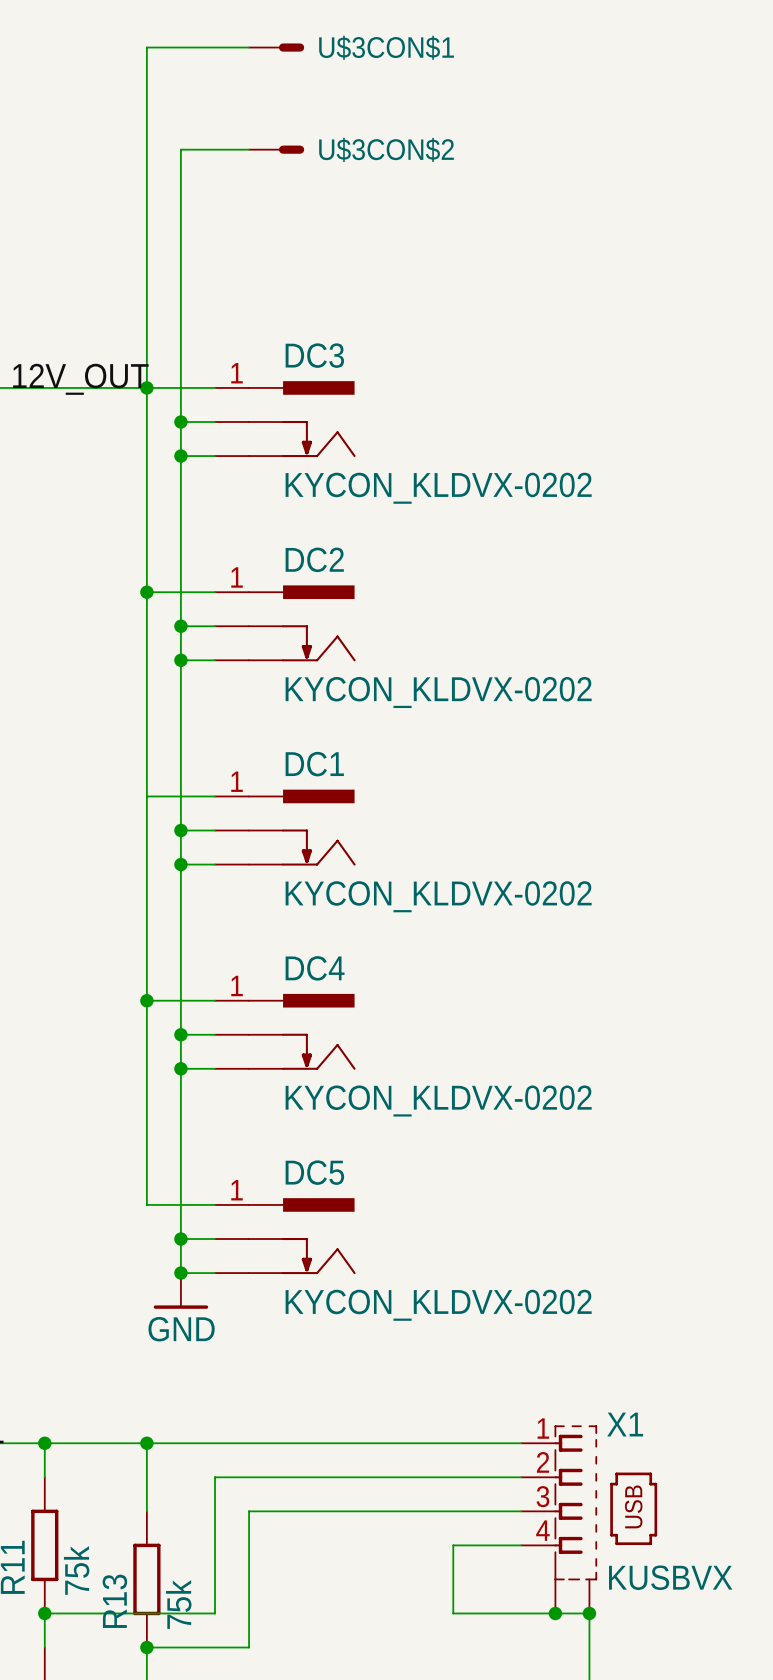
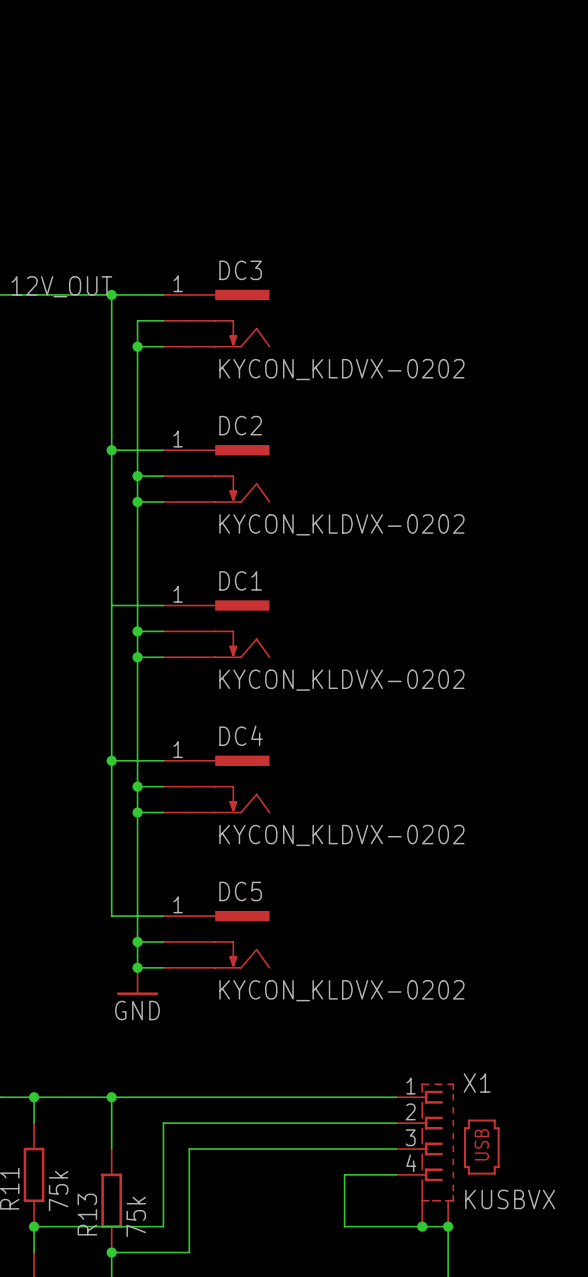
wire: (249, 47) (146, 47) (146, 387) -> none
U$3CON$1: (276, 47) -> none
wire: (249, 149) (180, 149) (180, 422) -> none
U$3CON$2: (276, 149) -> none
junction: (180, 422) -> none

